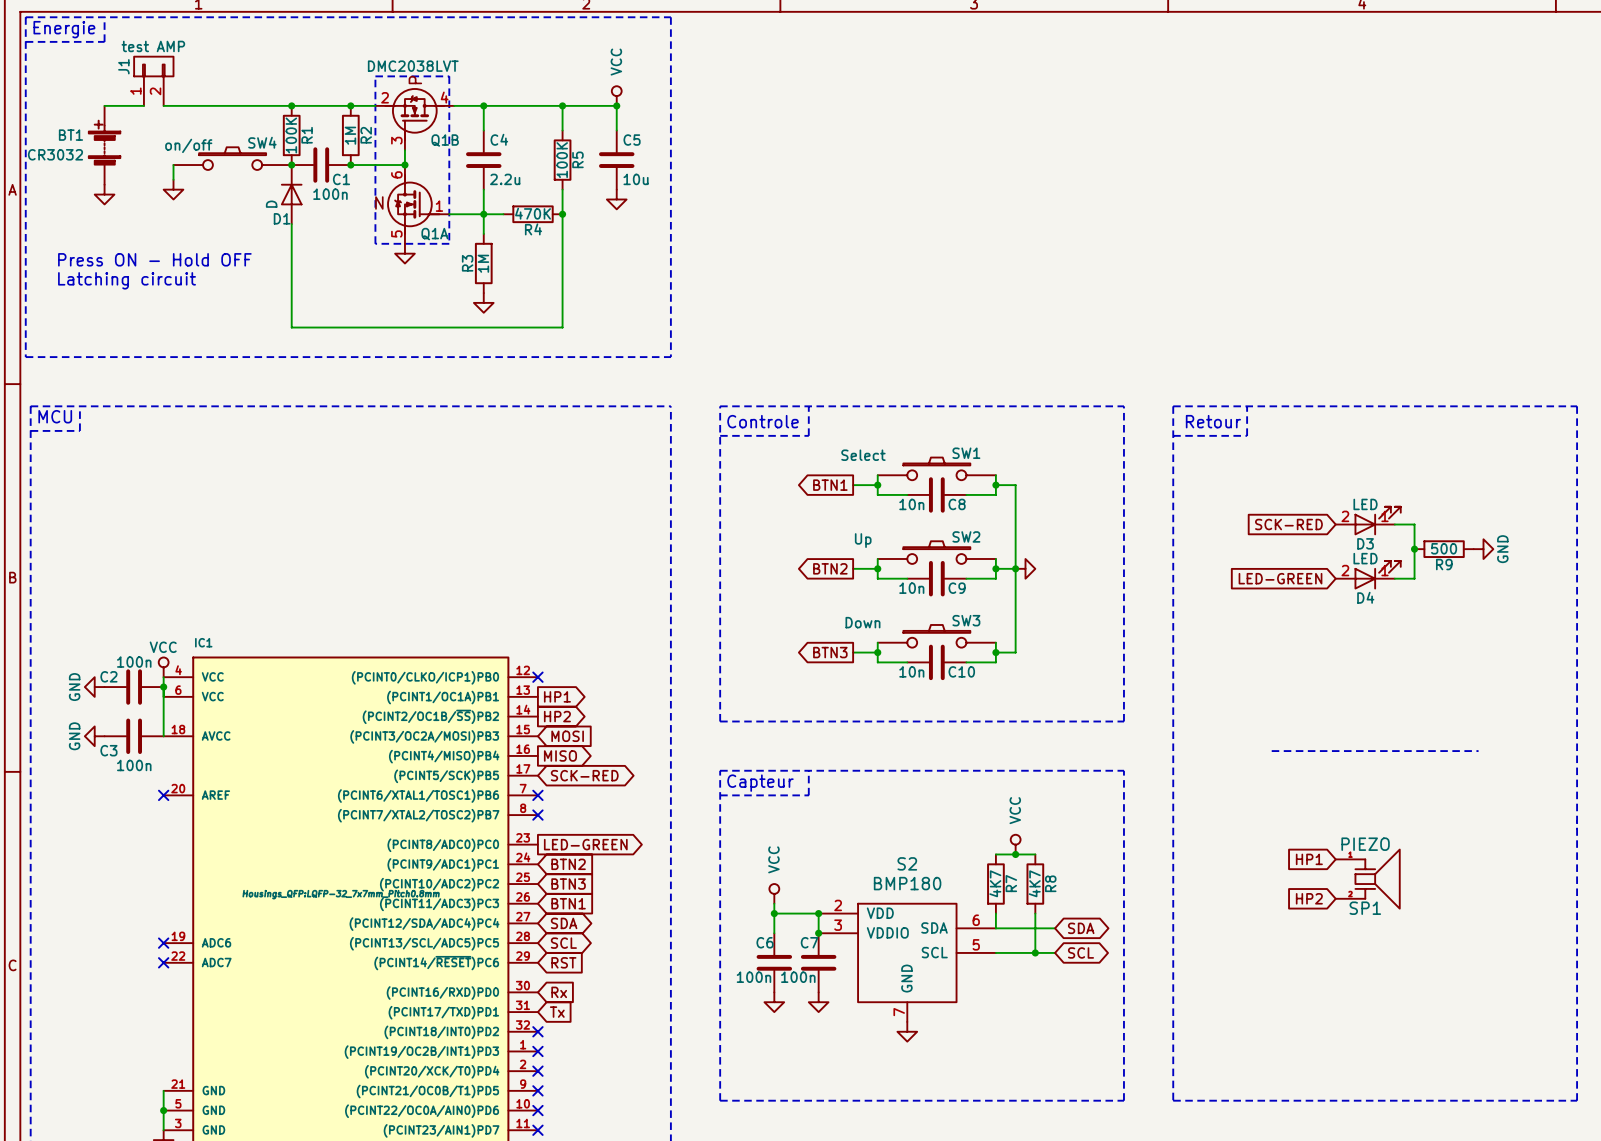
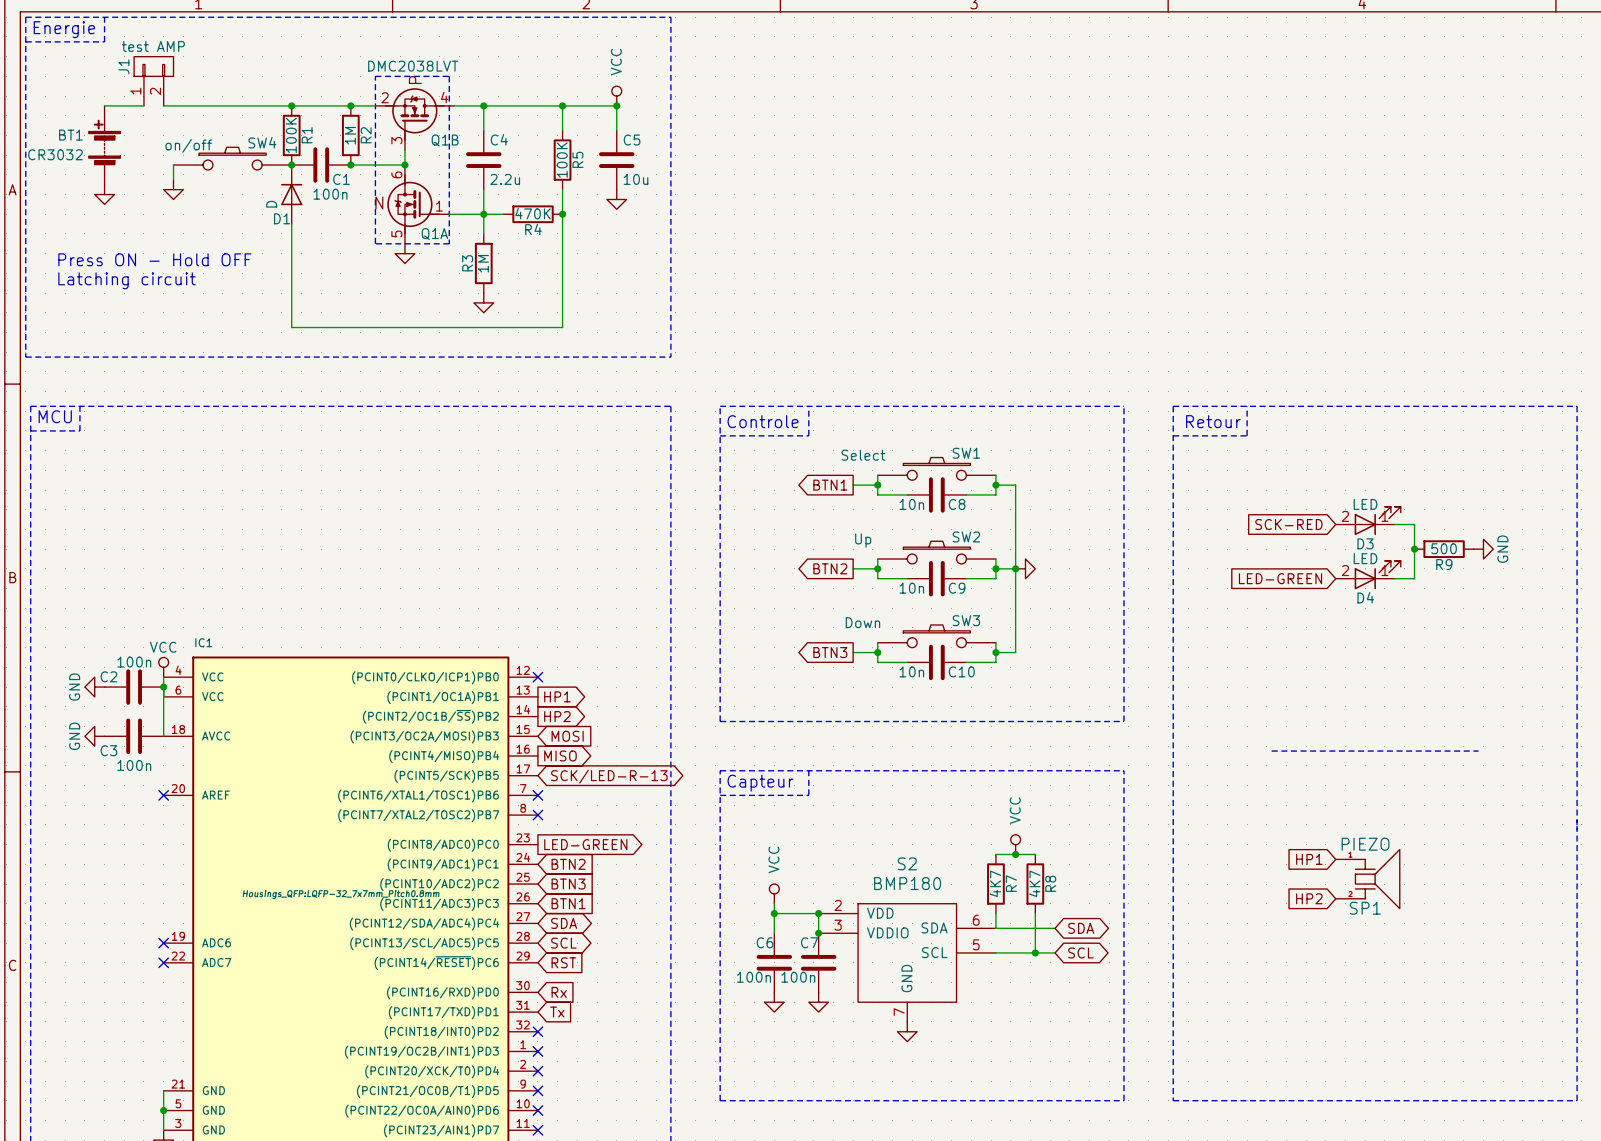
global label: SCK-RED (584, 775) -> SCK/LED-R-13 (609, 776)

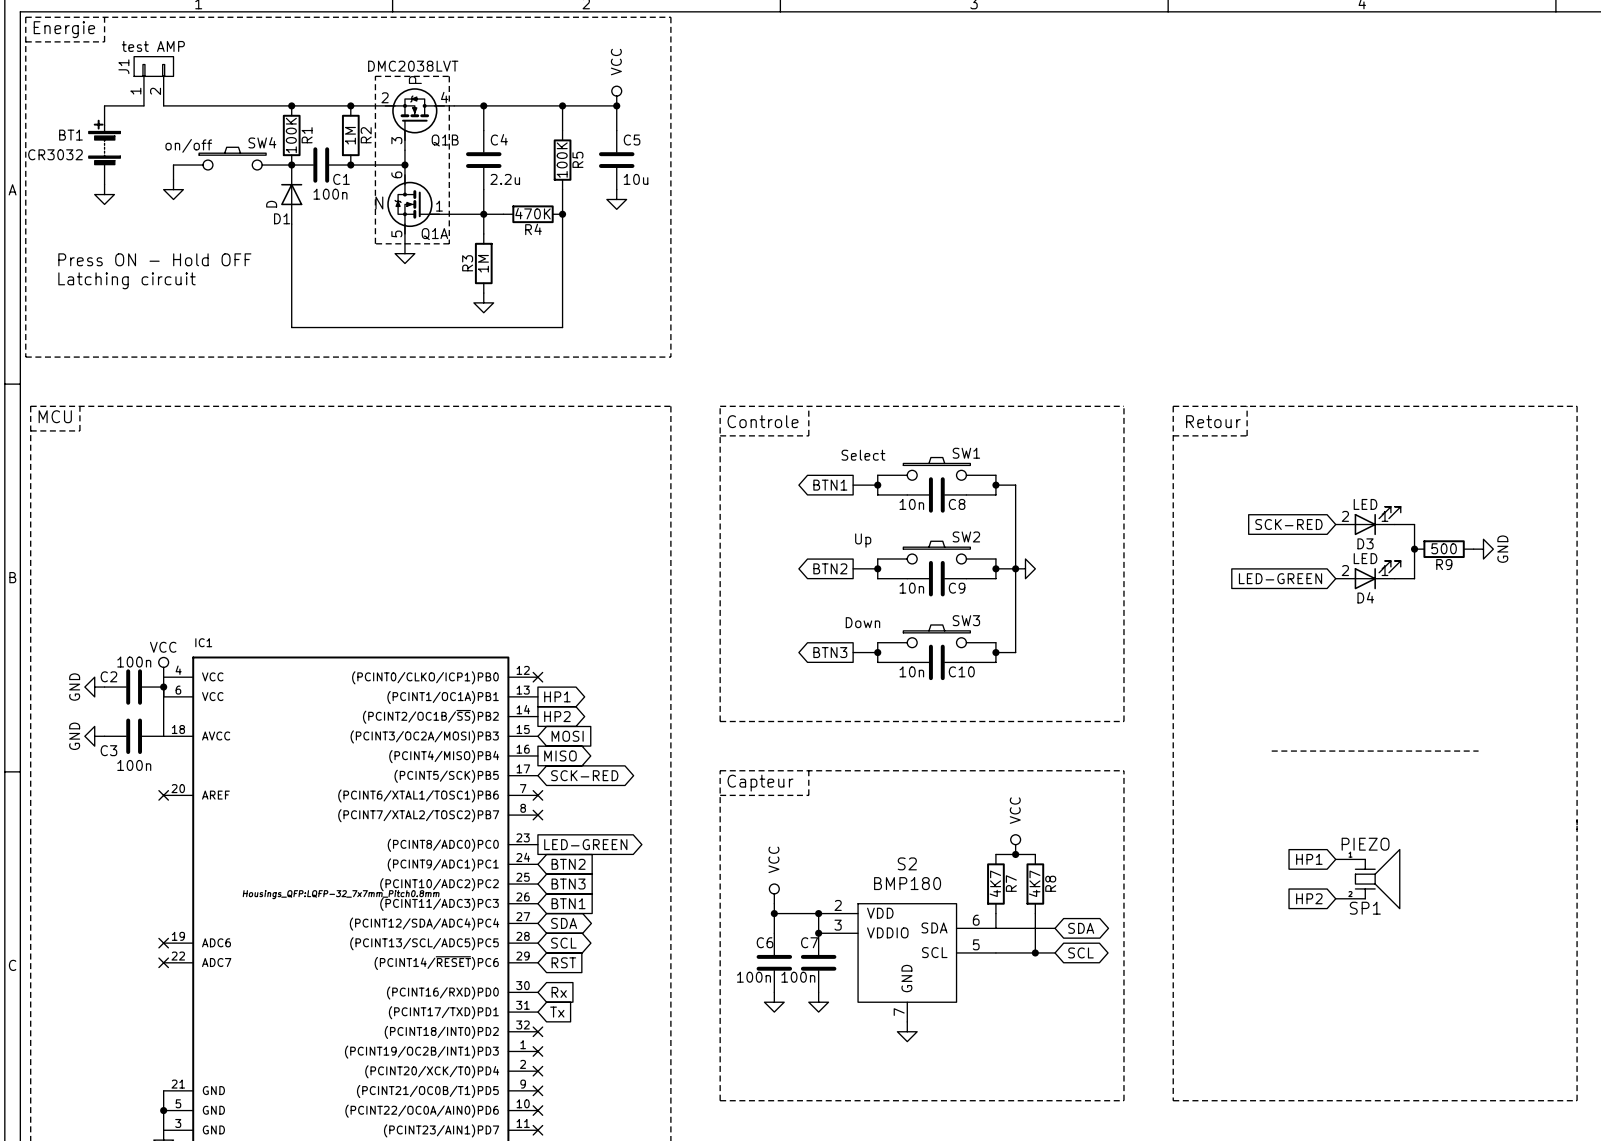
global label: SCK/LED-R-13 (609, 776) -> SCK-RED (584, 775)

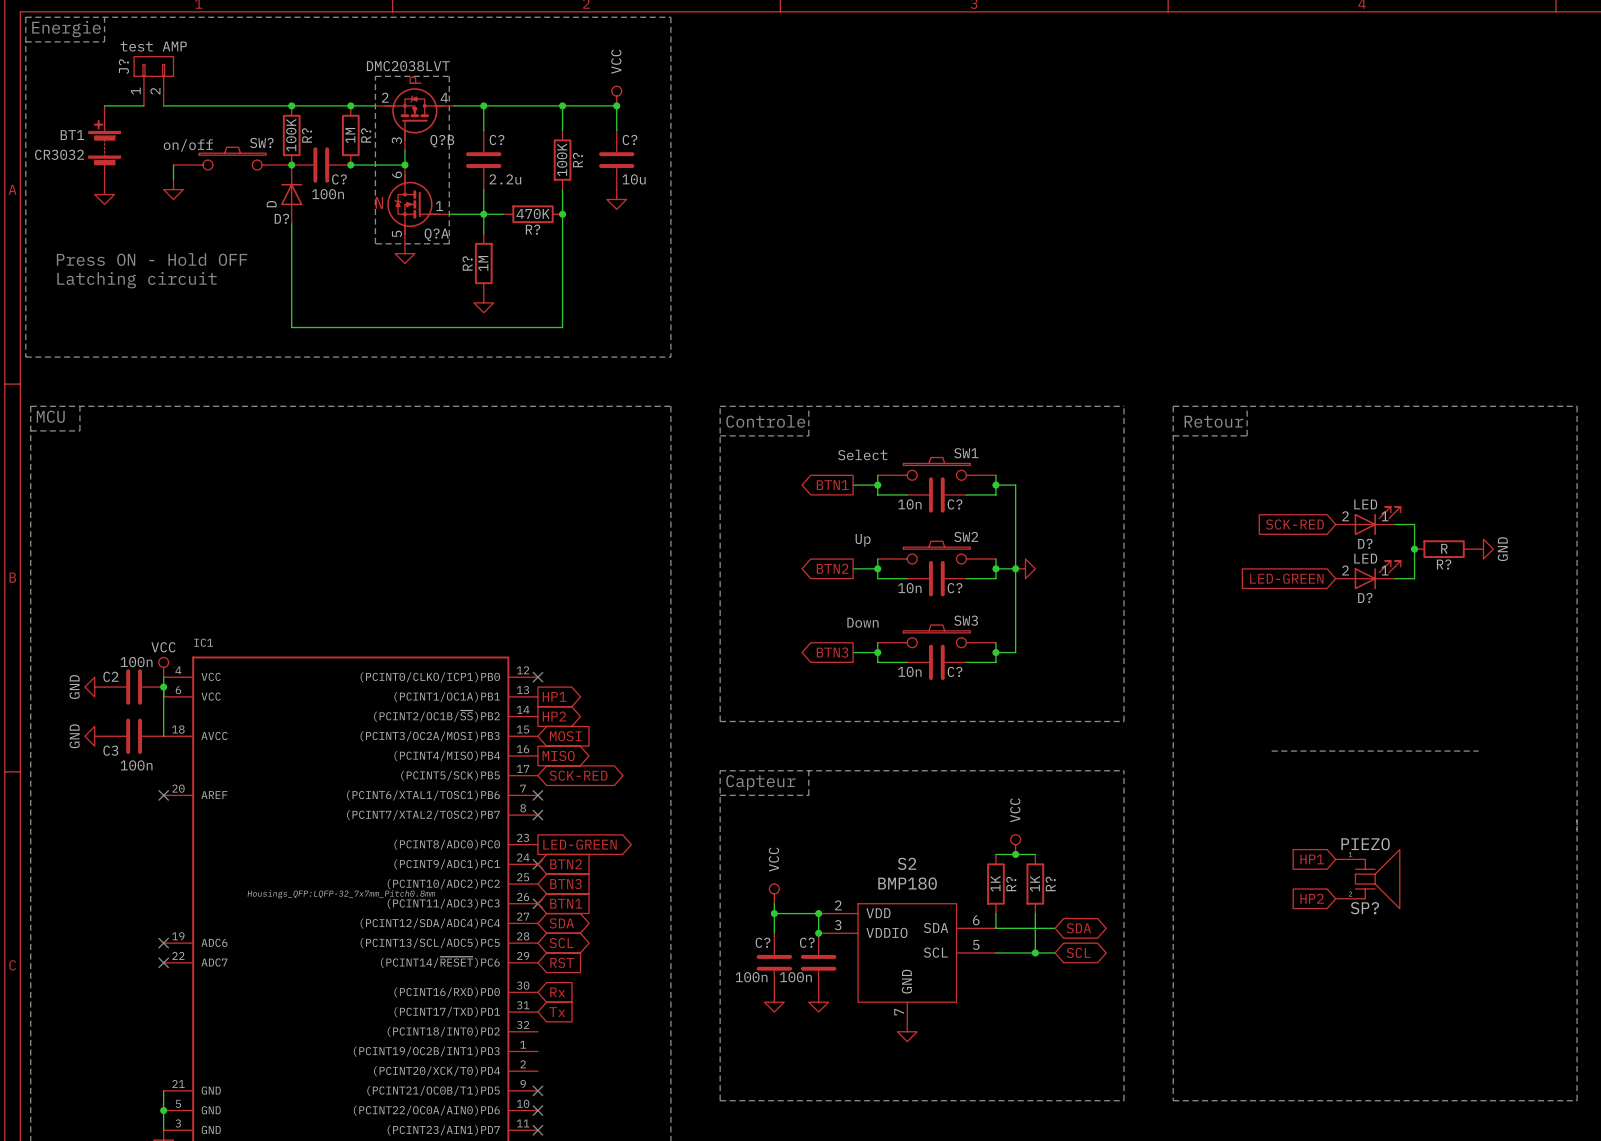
J1 name: J1 (123, 66) -> J? (123, 66)
R1 name: R1 (307, 135) -> R? (307, 135)
R2 name: R2 (366, 135) -> R? (366, 135)
C4 name: C4 (499, 139) -> C? (497, 140)
Q1B name: Q1B (445, 140) -> Q?B (442, 141)
C5 name: C5 (632, 140) -> C? (629, 140)
SW4 name: SW4 (262, 142) -> SW? (261, 142)
R5 name: R5 (577, 159) -> R? (577, 160)
C1 name: C1 (341, 179) -> C? (339, 179)
D1 name: D1 (282, 218) -> D? (281, 218)
R4 name: R4 (533, 229) -> R? (533, 229)
Q1A name: Q1A (434, 234) -> Q?A (436, 234)
R3 name: R3 (467, 263) -> R? (467, 263)
C8 name: C8 (957, 504) -> C? (955, 504)
D3 name: D3 (1365, 543) -> D? (1365, 543)
R9 value: 500 (1444, 548) -> R (1444, 548)
R9 name: R9 (1444, 564) -> R? (1444, 564)
C9 name: C9 (957, 588) -> C? (955, 588)
D4 name: D4 (1365, 597) -> D? (1365, 598)
C10 name: C10 (961, 671) -> C? (955, 671)
no-connect mark: none -> (537, 864)
R7 value: 4K7 (995, 883) -> 1K (995, 883)
R7 name: R7 (1011, 883) -> R? (1011, 884)
R8 value: 4K7 (1034, 883) -> 1K (1034, 883)
R8 name: R8 (1050, 883) -> R? (1050, 884)
no-connect mark: none -> (537, 903)
SP1 name: SP1 (1365, 908) -> SP? (1364, 908)
C6 name: C6 (765, 942) -> C? (762, 942)
C7 name: C7 (809, 942) -> C? (807, 942)
no-connect mark: (537, 1031) -> none
no-connect mark: (537, 1051) -> none
no-connect mark: (537, 1071) -> none

